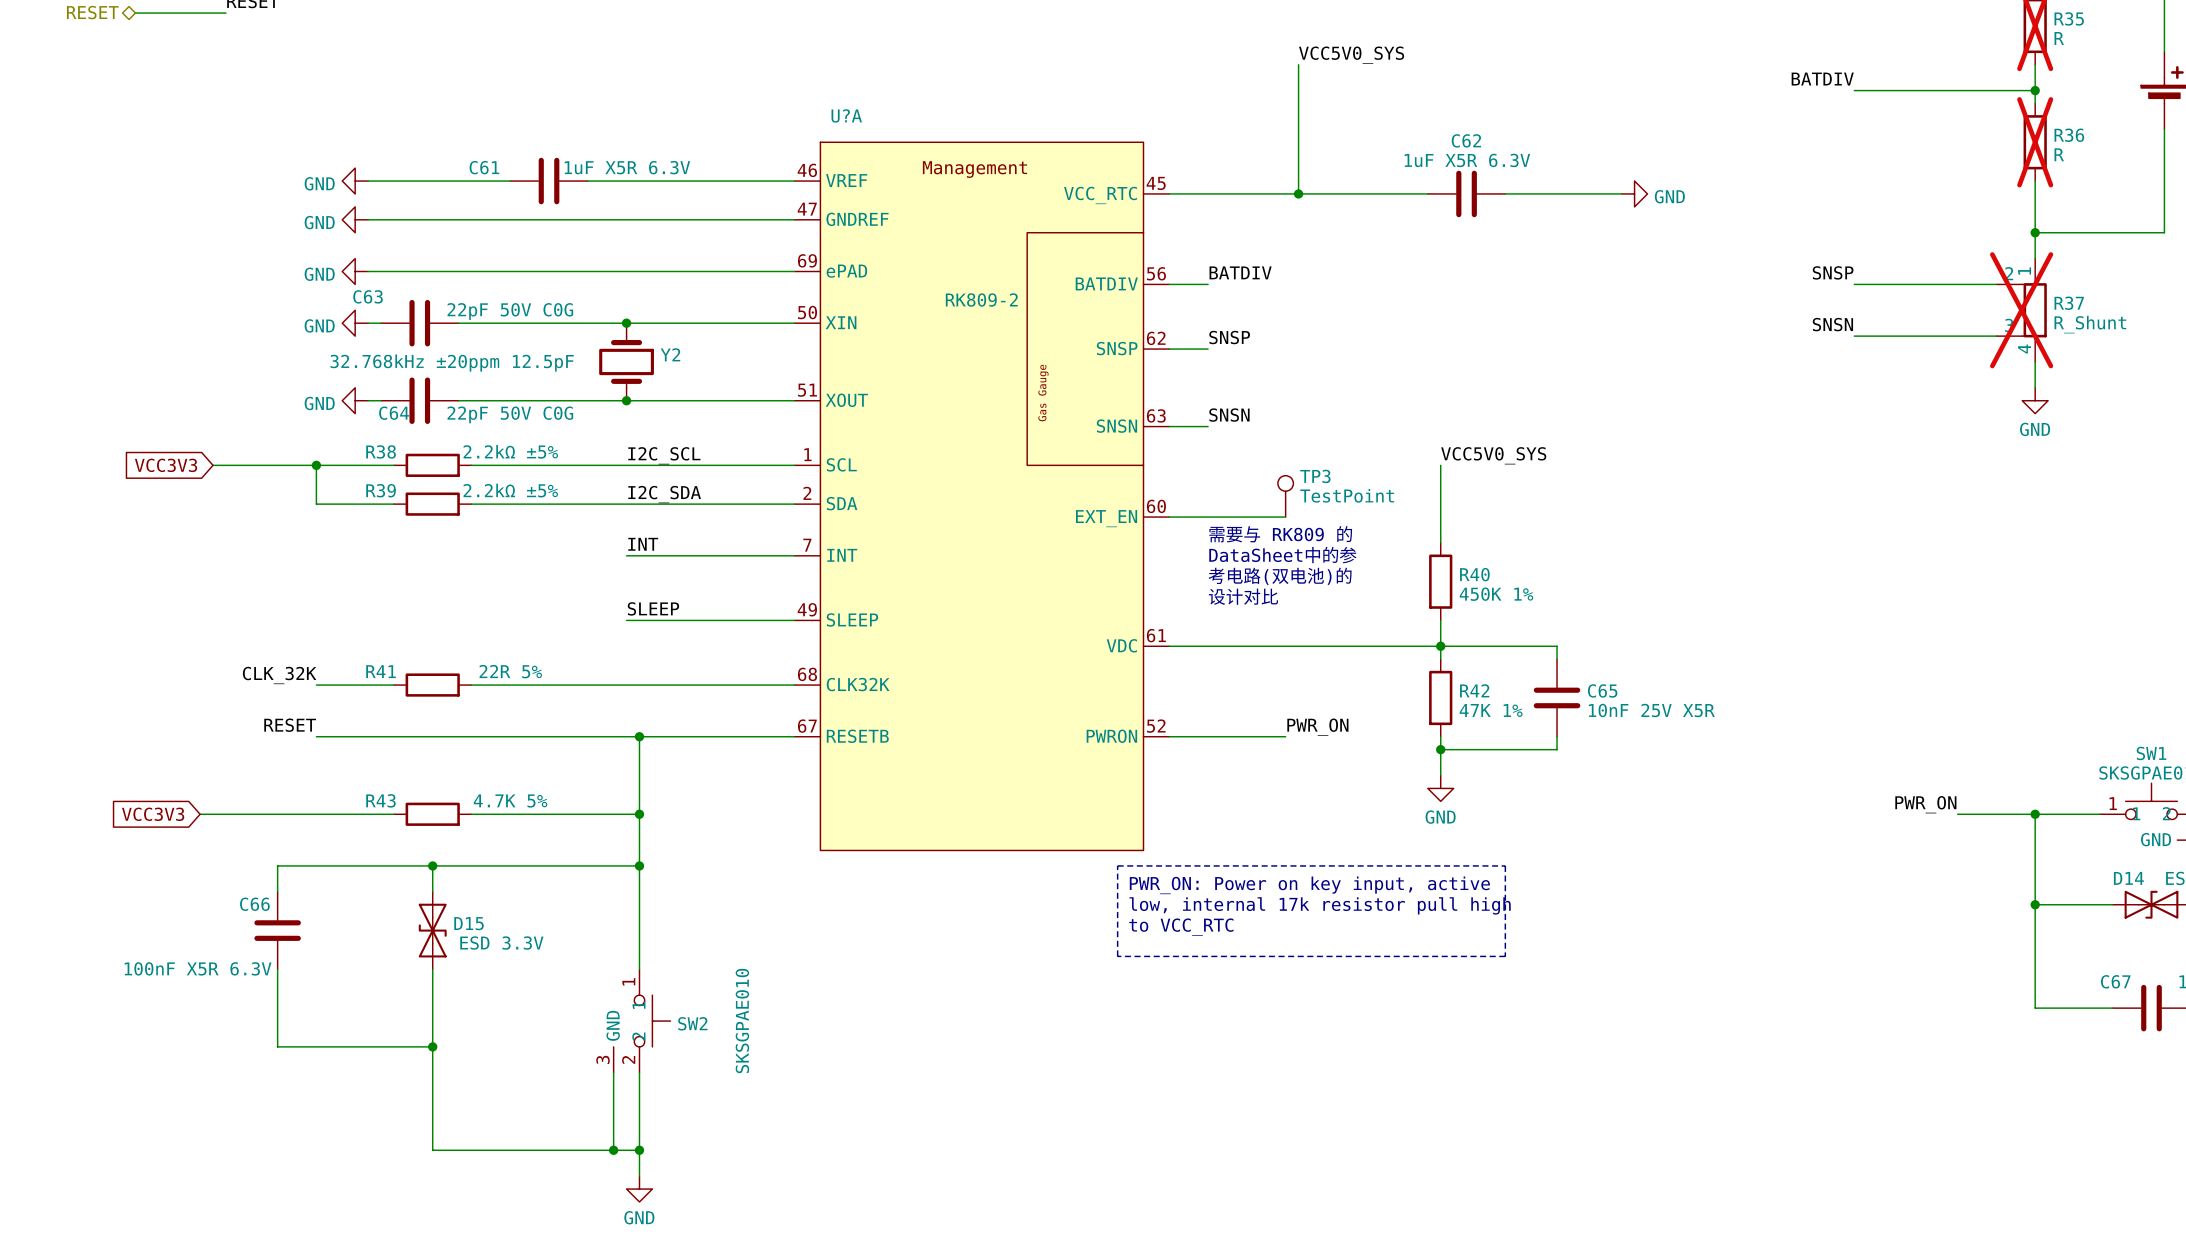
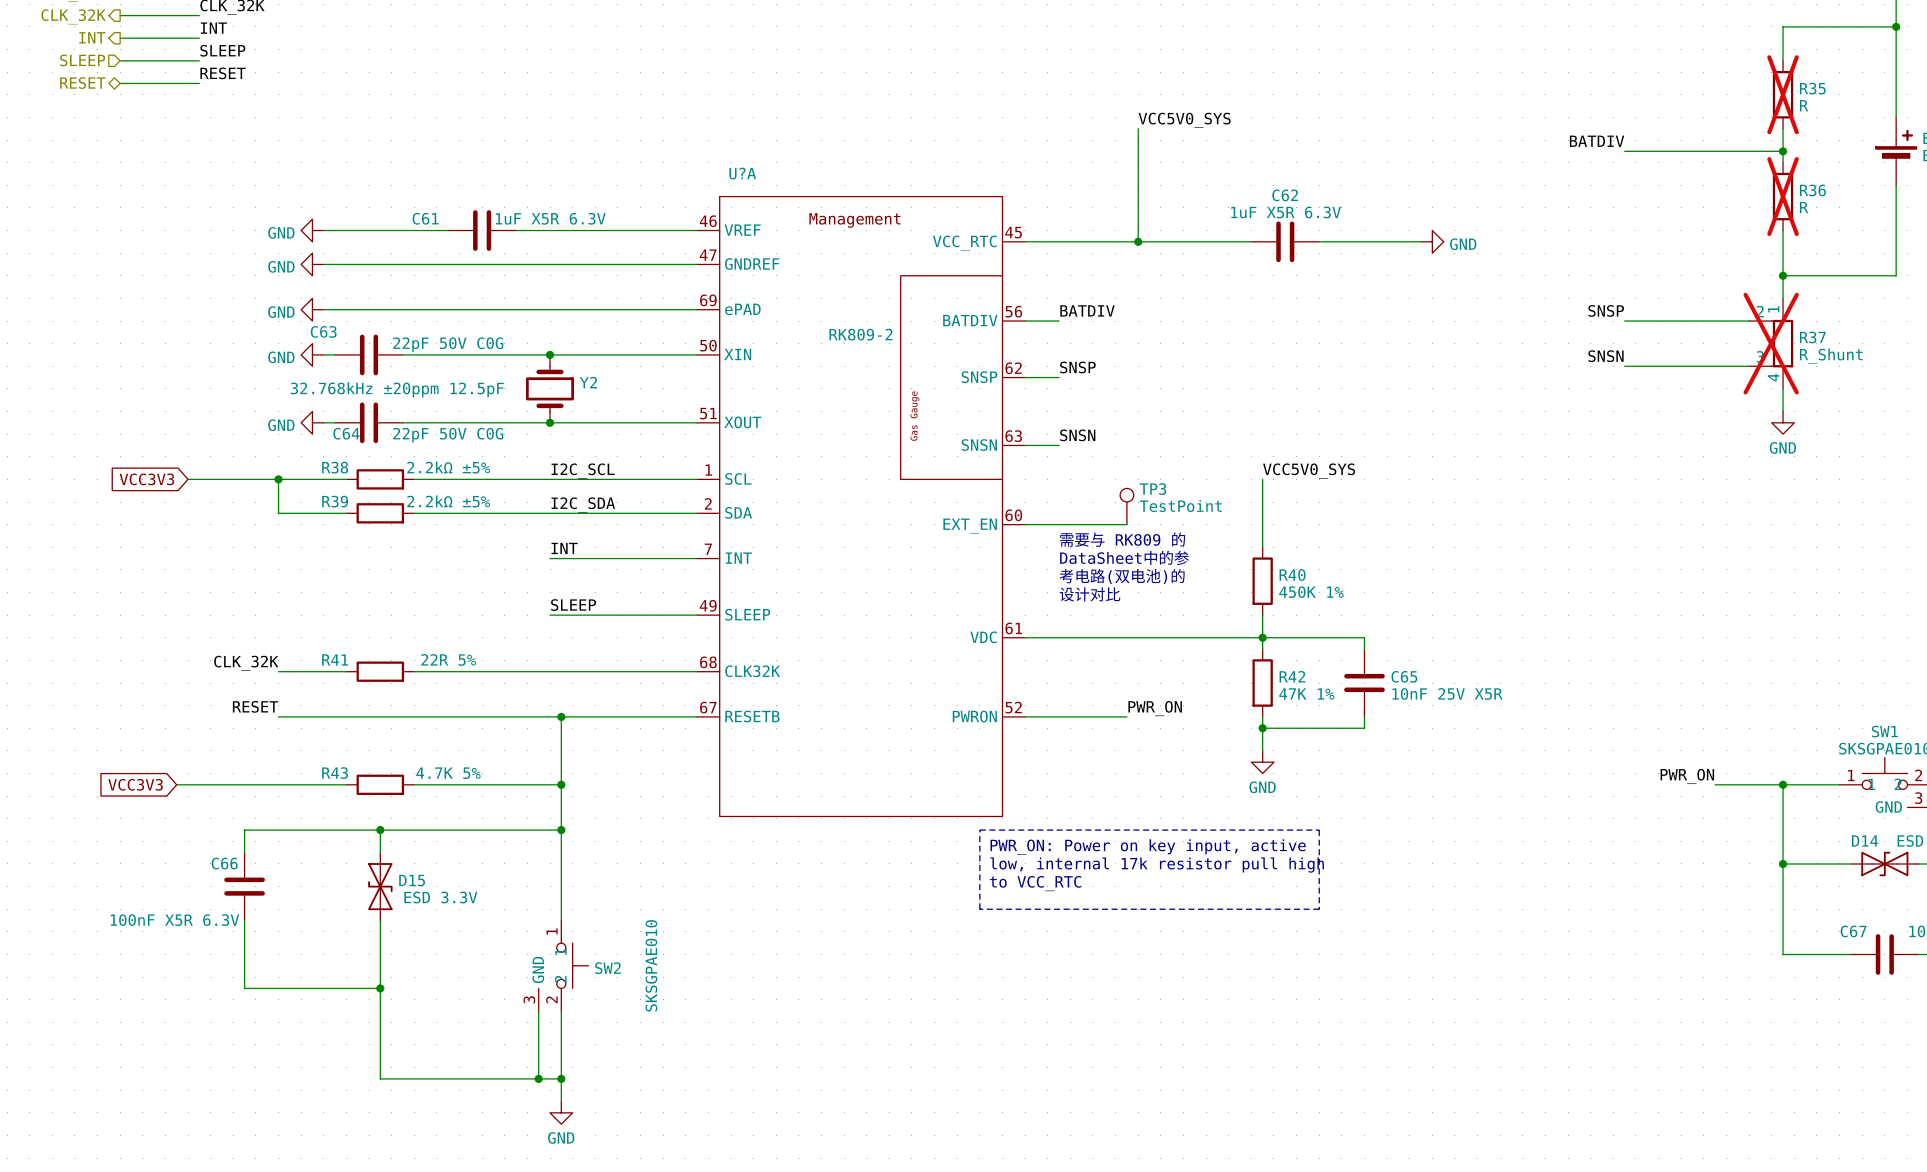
U?A symbol: [794, 142, 1170, 851] -> [697, 196, 1026, 817]

